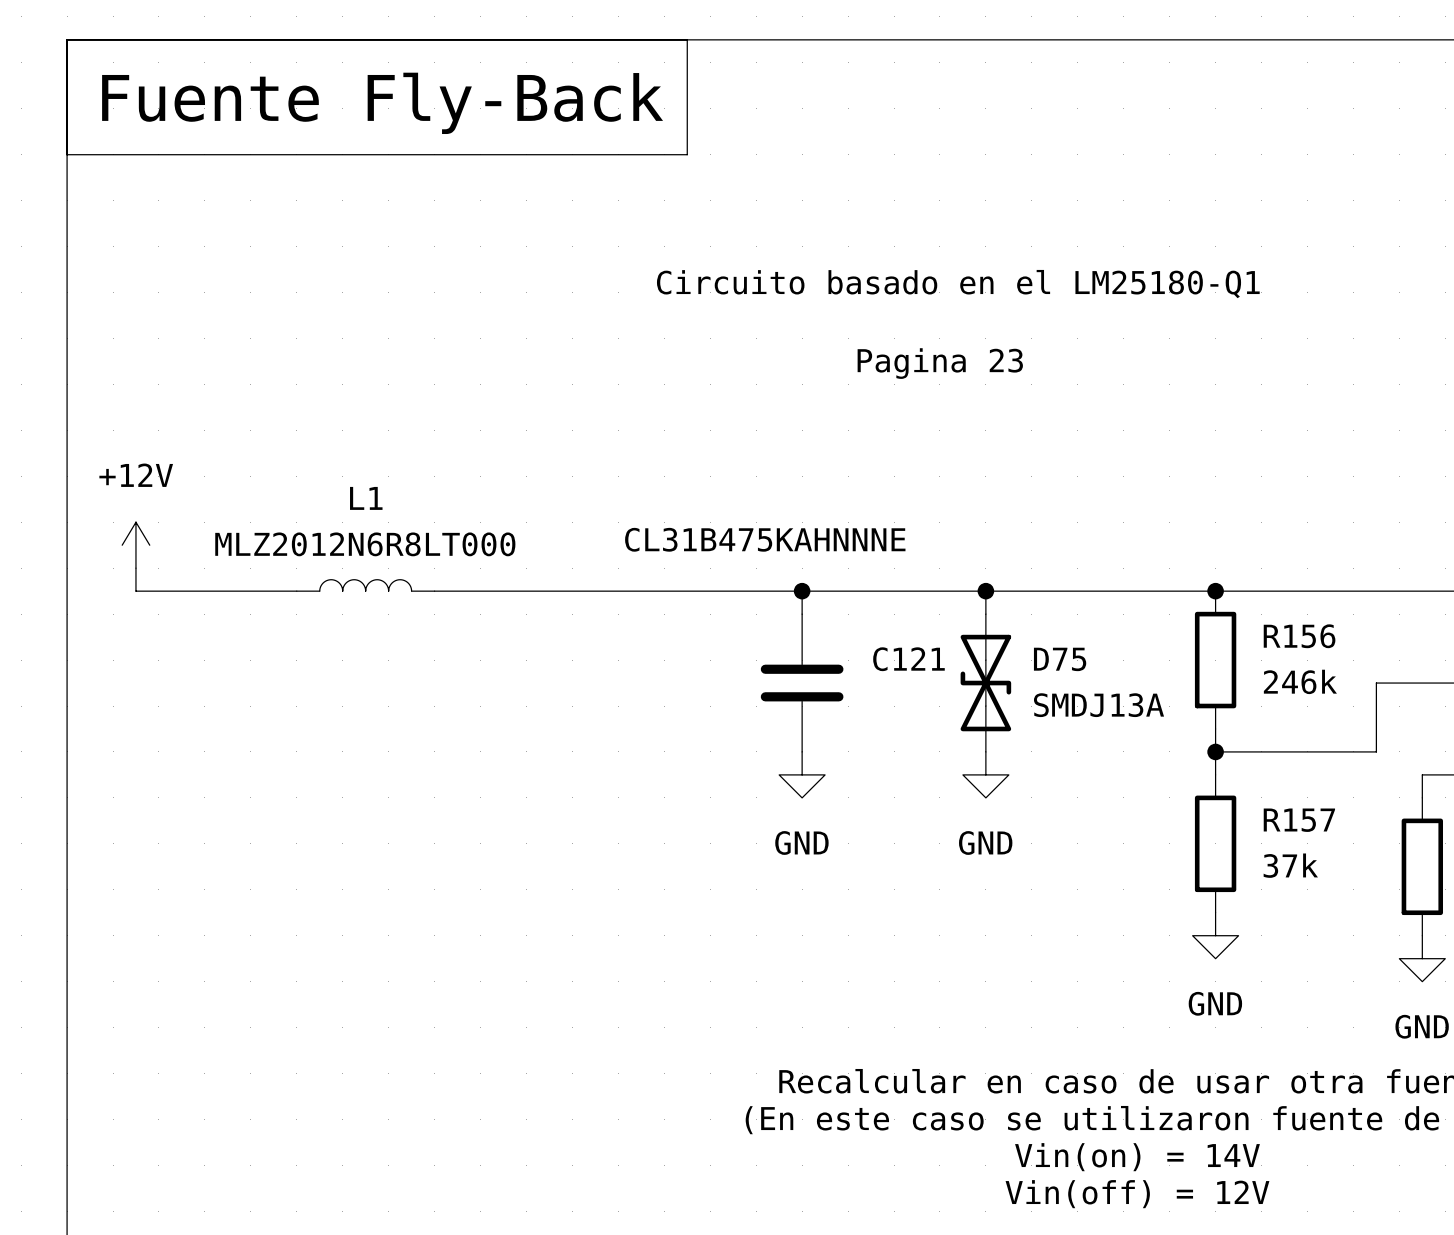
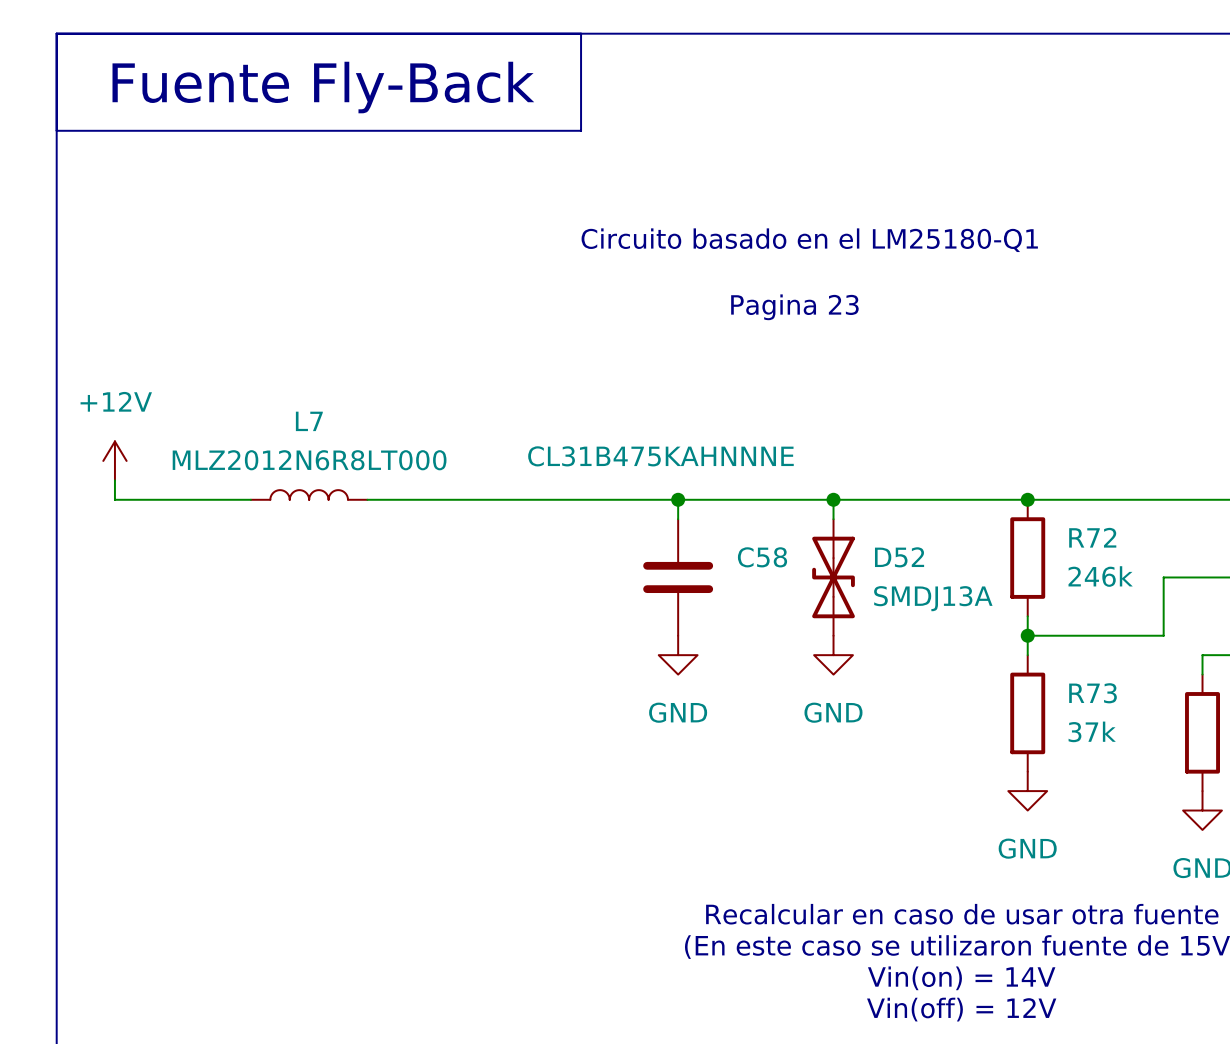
L1 name: L1 (366, 498) -> L7 (309, 421)
R156 name: R156 (1299, 636) -> R72 (1092, 537)
C121 name: C121 (908, 659) -> C58 (762, 557)
D75 name: D75 (1060, 659) -> D52 (899, 557)
R157 name: R157 (1299, 820) -> R73 (1093, 693)

